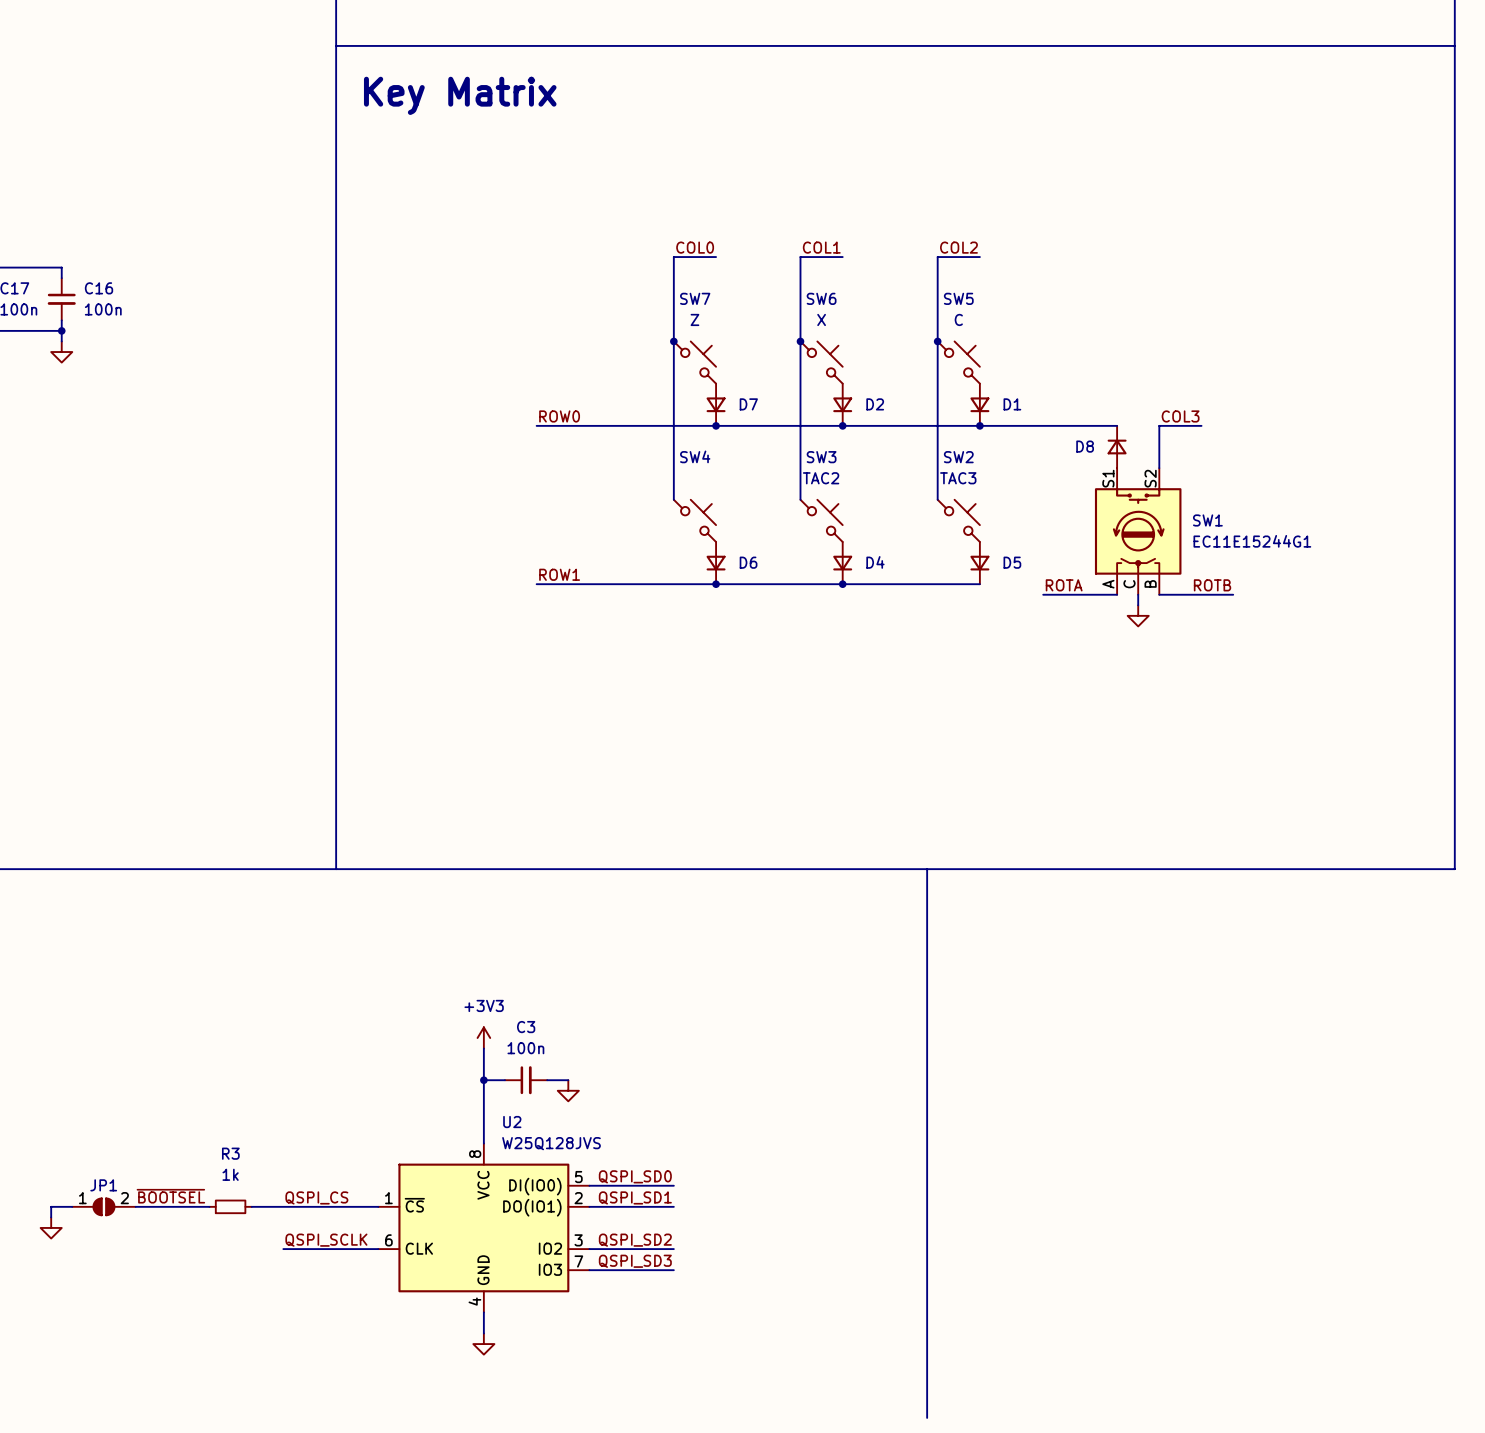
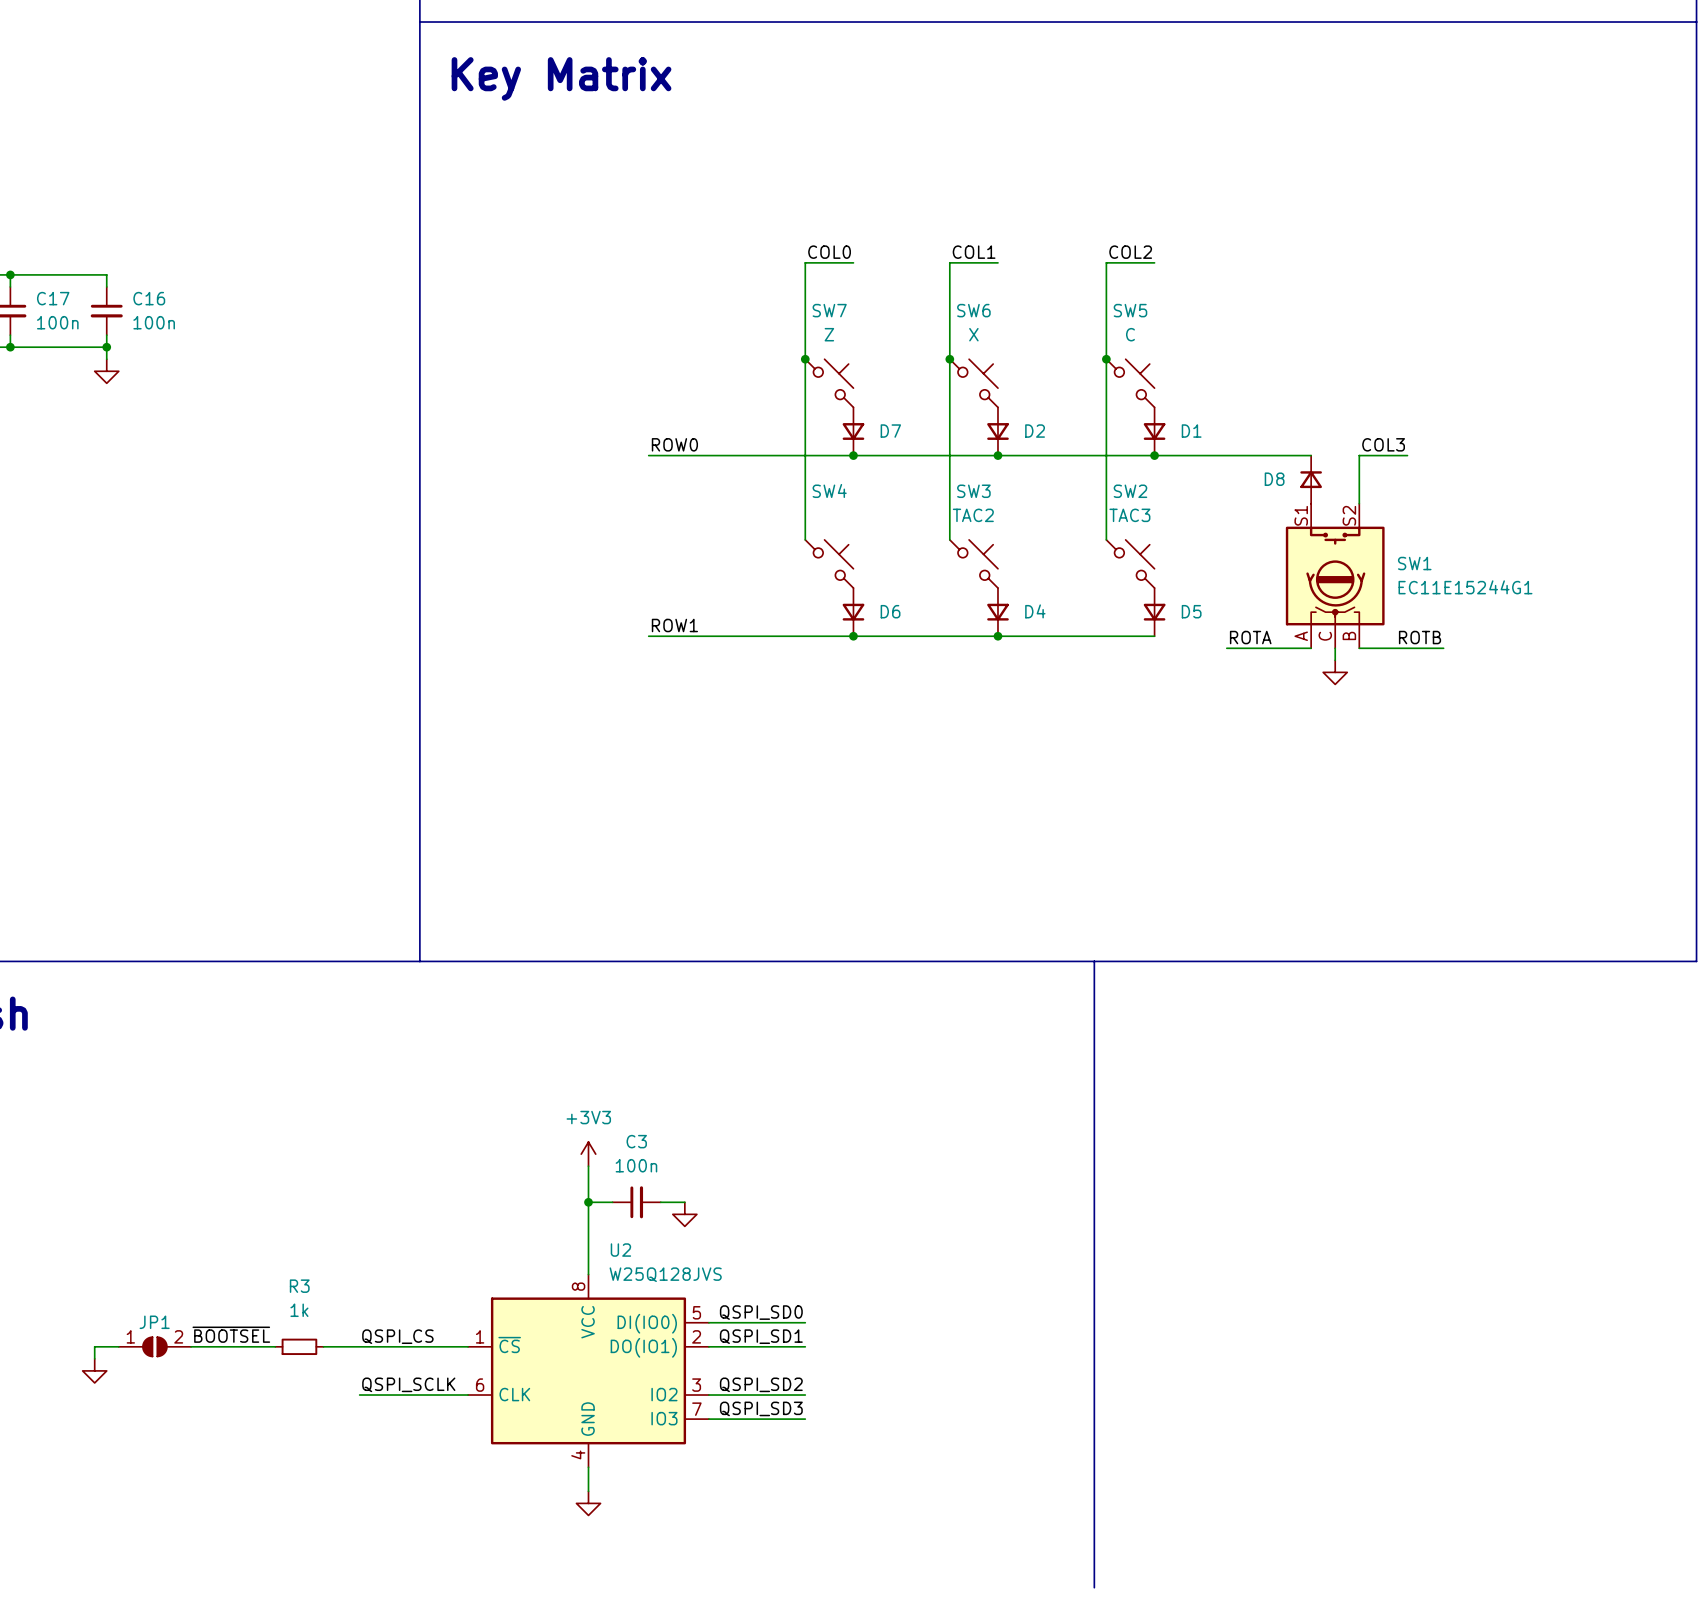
SW1 symbol: [1094, 468, 1182, 595] -> [1285, 503, 1385, 649]

